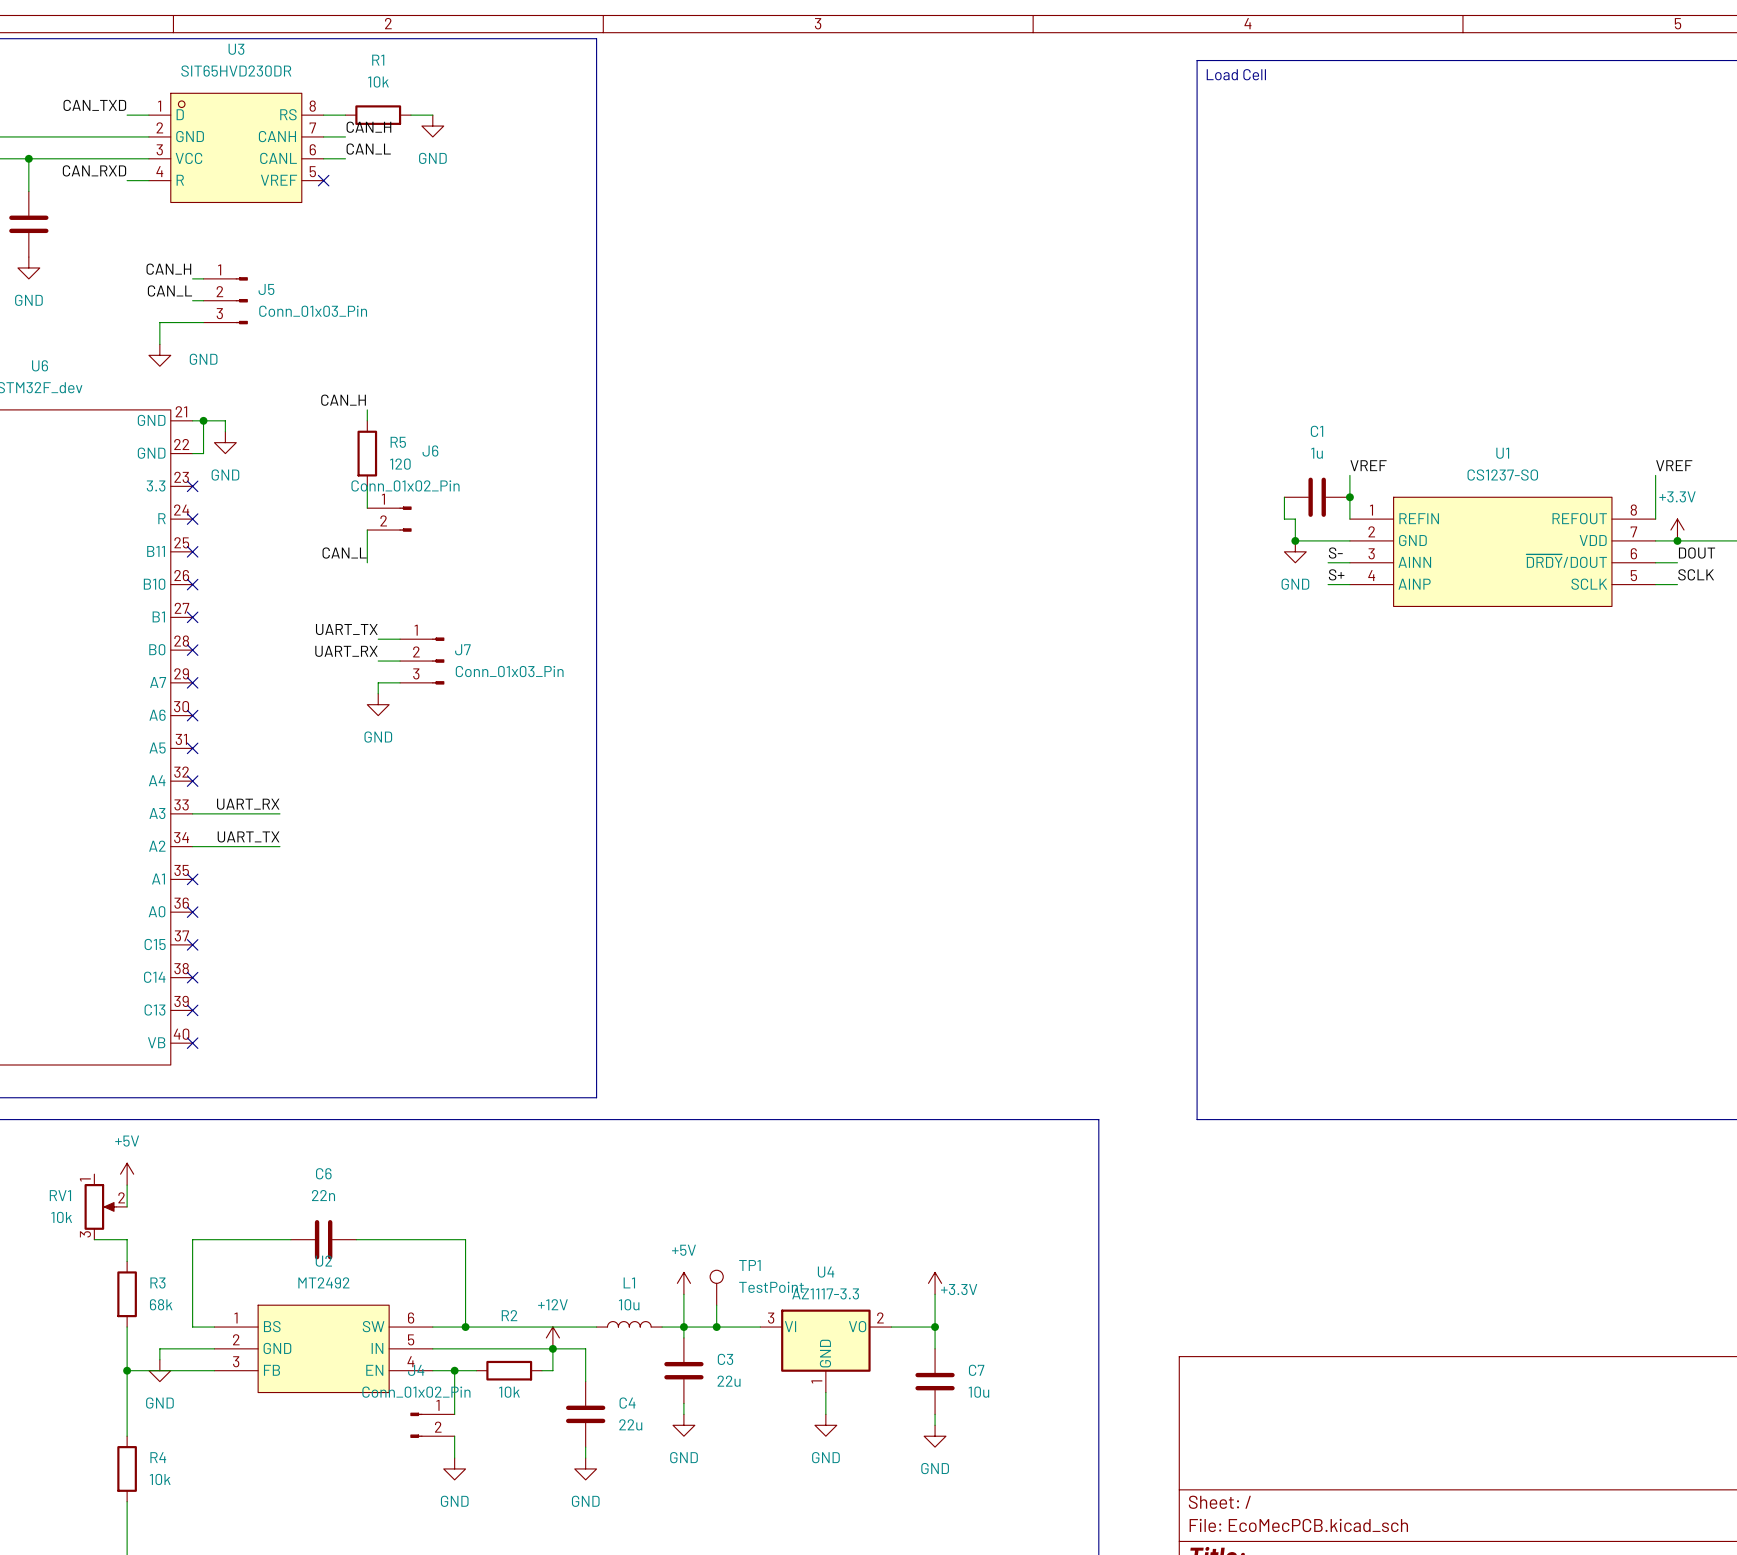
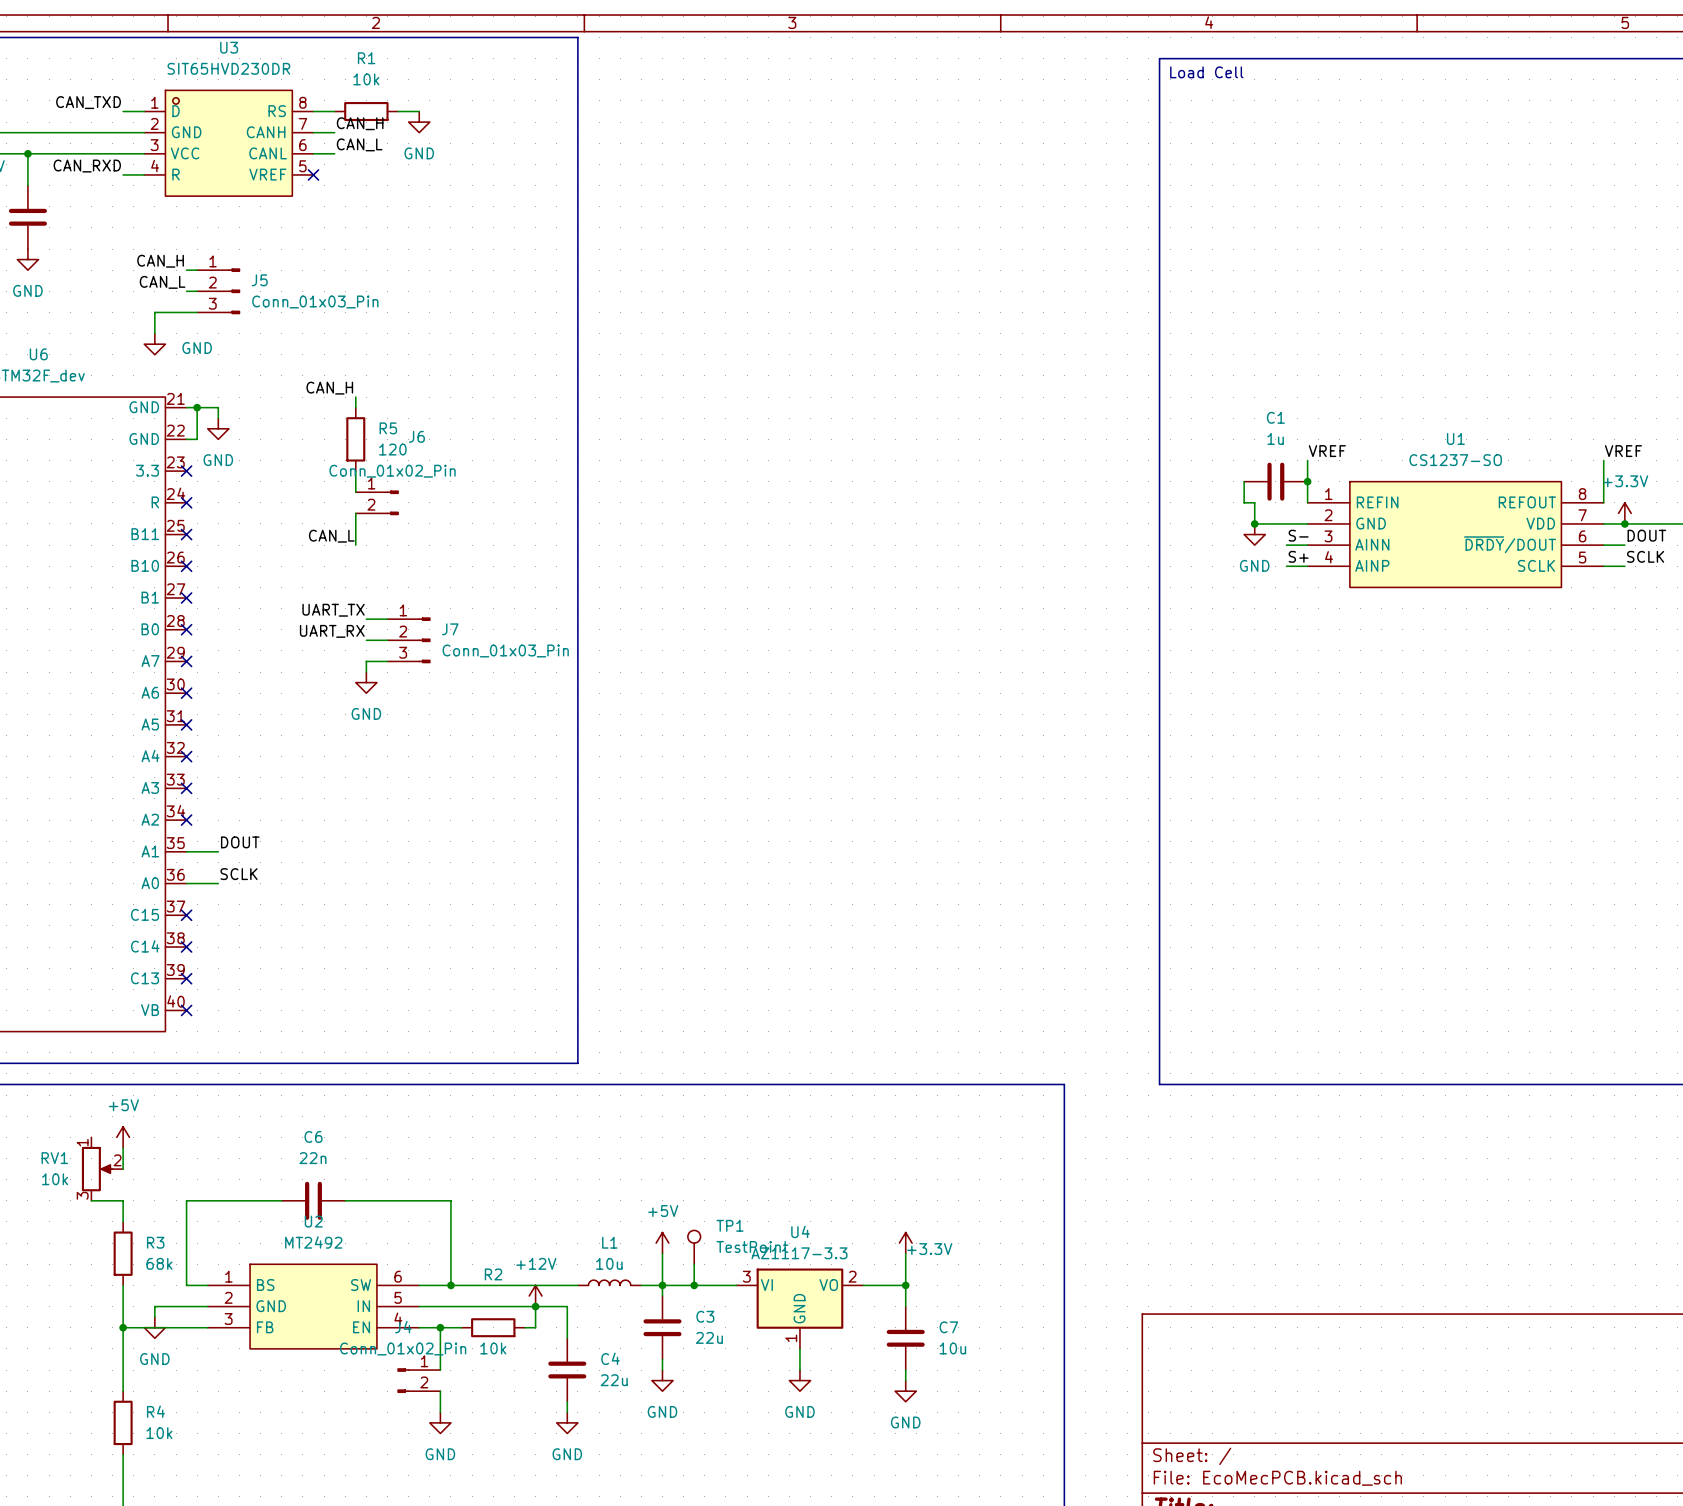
label: UART_RX (248, 804) -> none
wire: (192, 813) (279, 813) -> none
no-connect mark: none -> (186, 788)
label: UART_TX (248, 836) -> none
wire: (192, 846) (279, 846) -> none
no-connect mark: none -> (186, 820)
label: none -> DOUT (240, 842)
wire: none -> (186, 851) (218, 851)
no-connect mark: (192, 879) -> none
label: none -> SCLK (239, 874)
wire: none -> (186, 883) (218, 883)
no-connect mark: (192, 912) -> none

